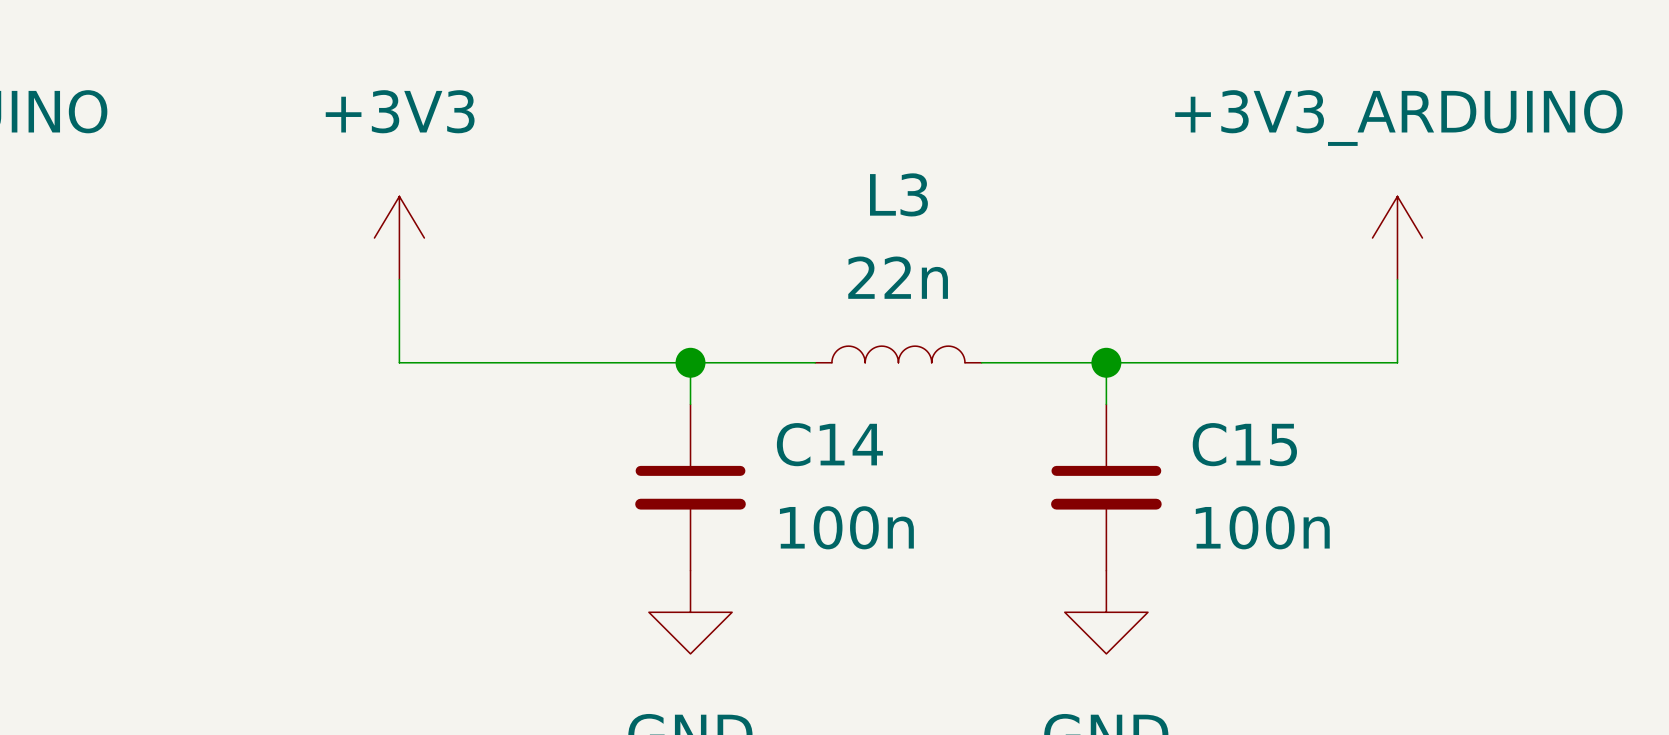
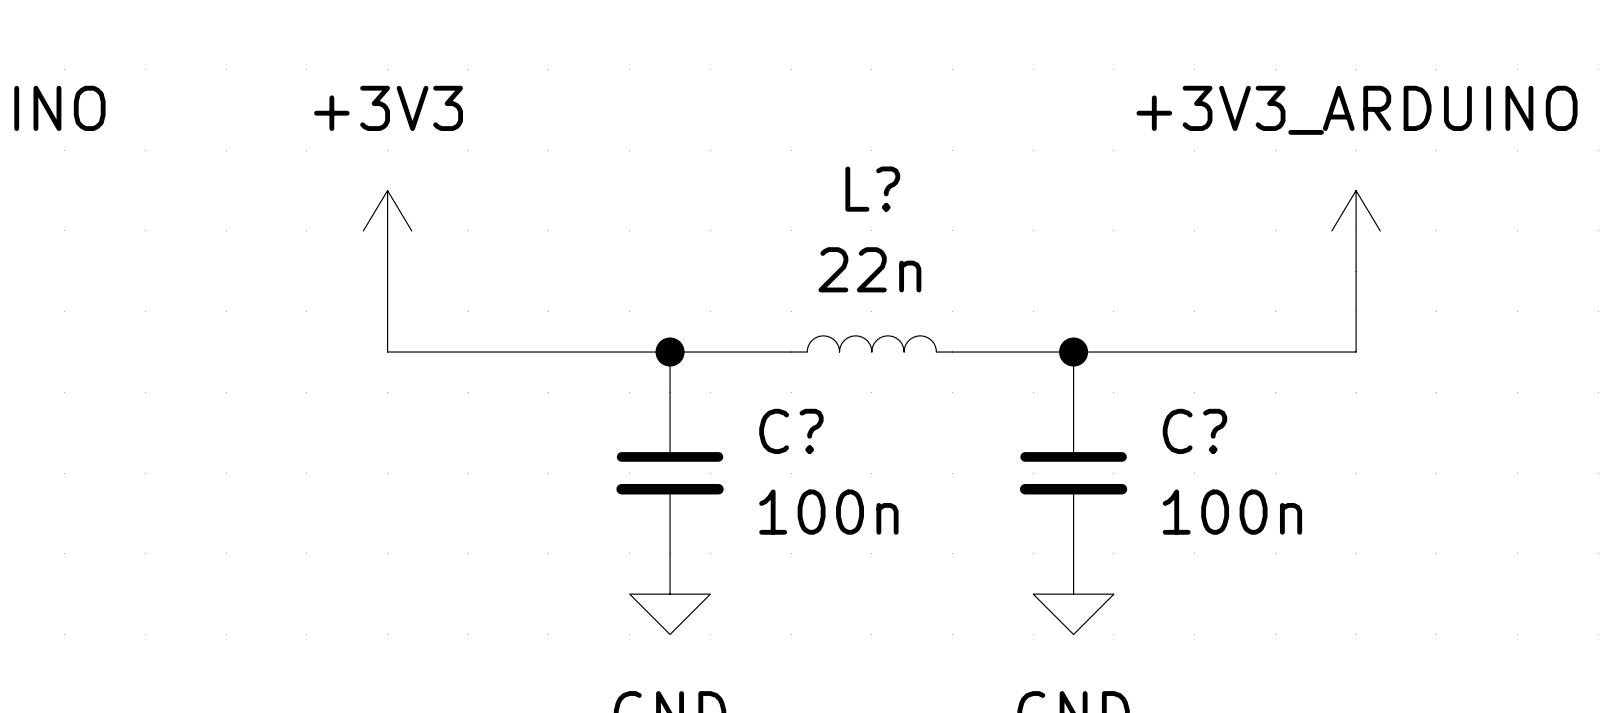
L3 name: L3 (898, 194) -> L? (872, 189)
C14 name: C14 (829, 444) -> C? (791, 431)
C15 name: C15 (1244, 444) -> C? (1194, 431)

